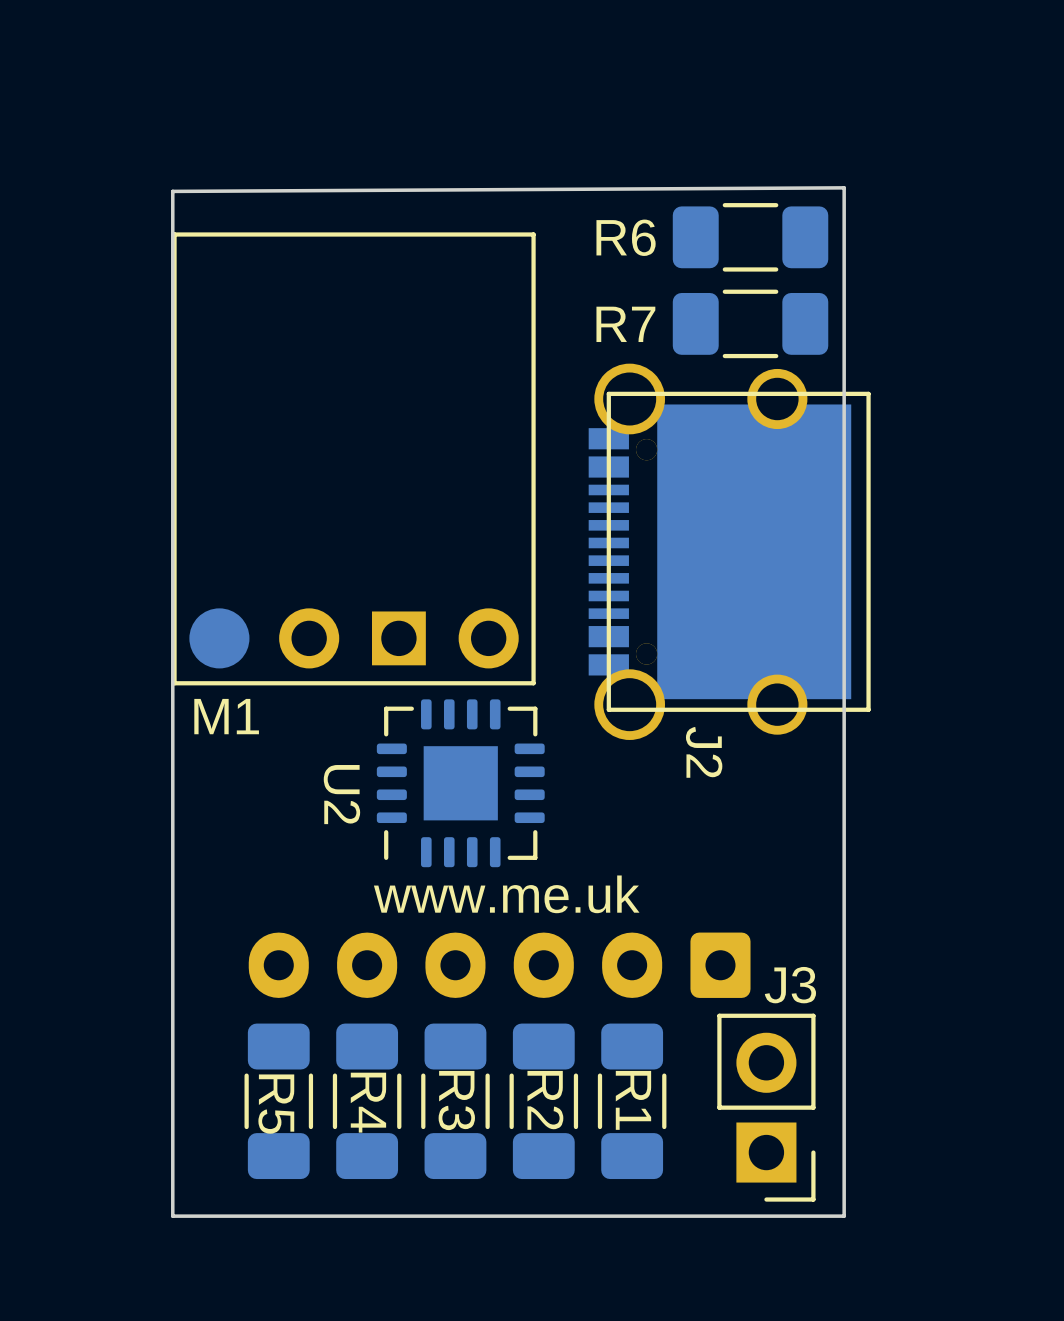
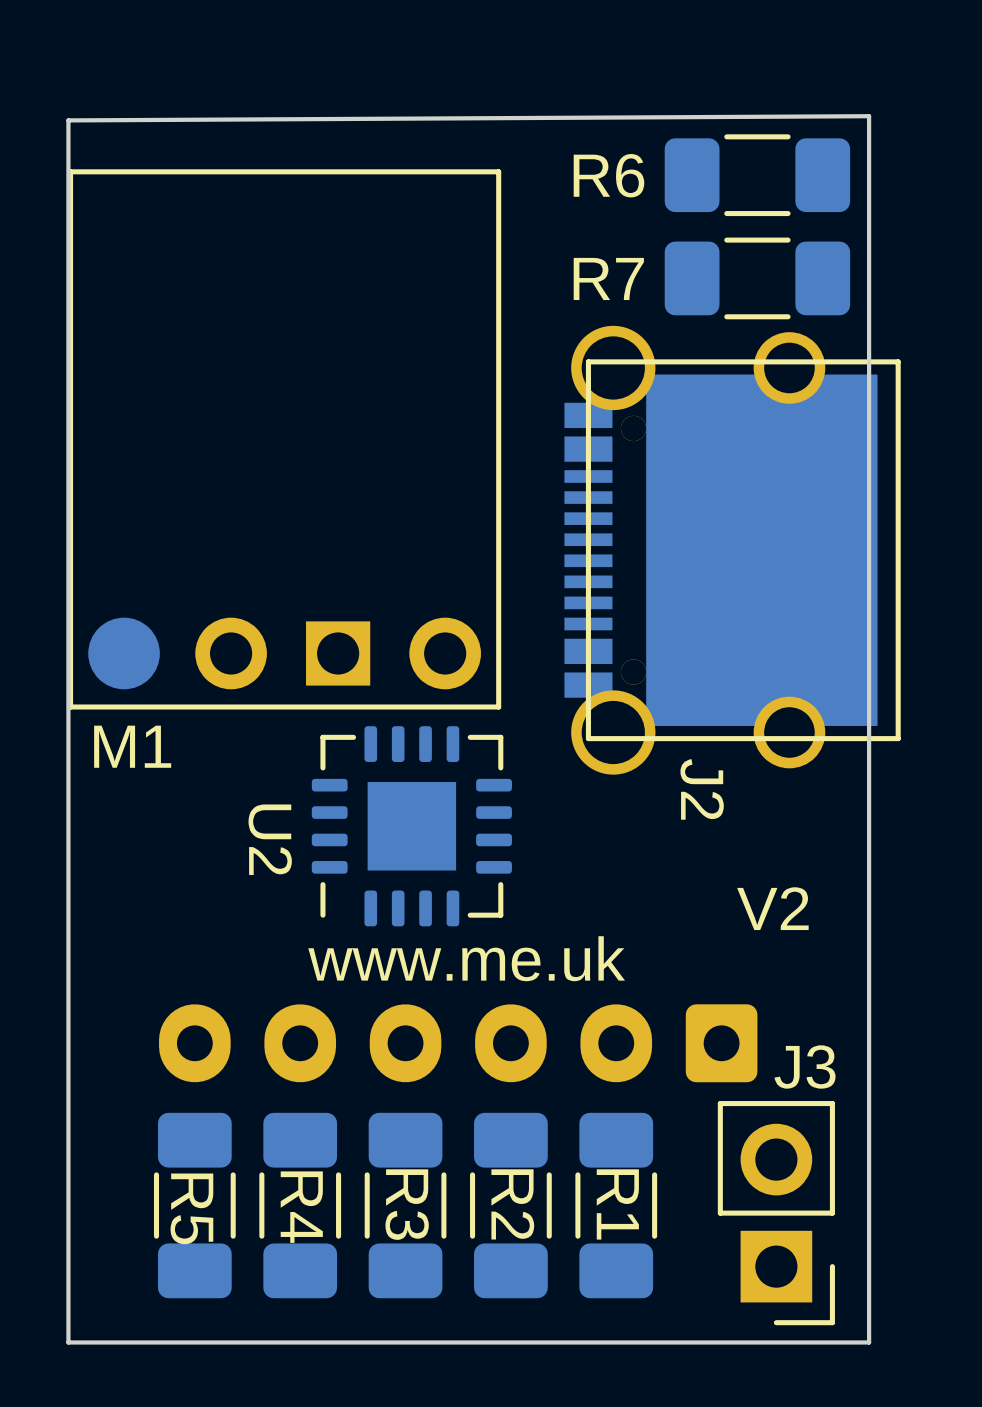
text: none -> V2 (772, 908)

